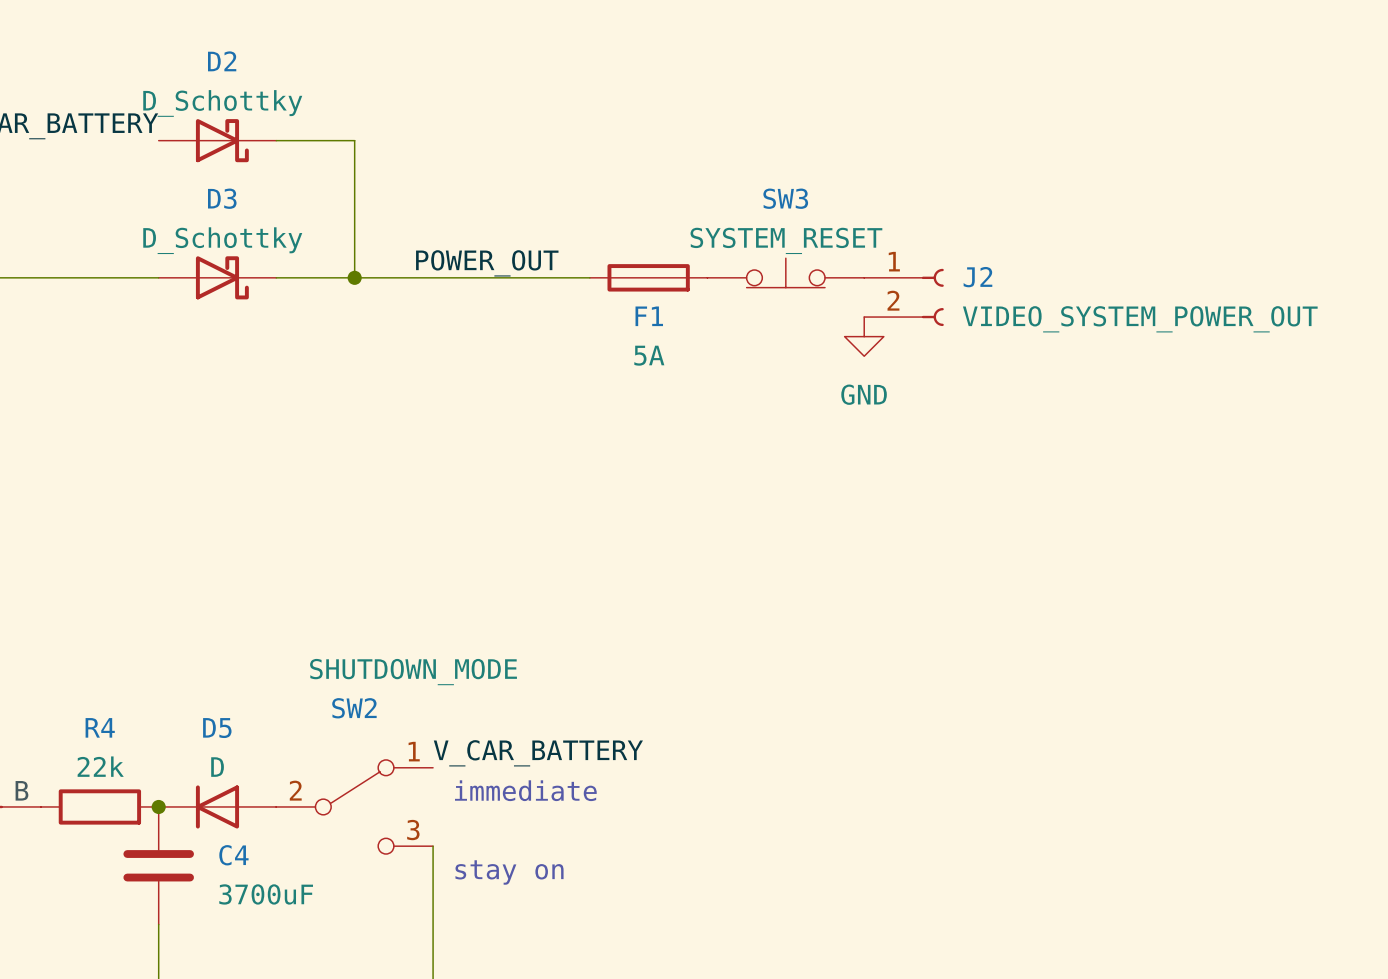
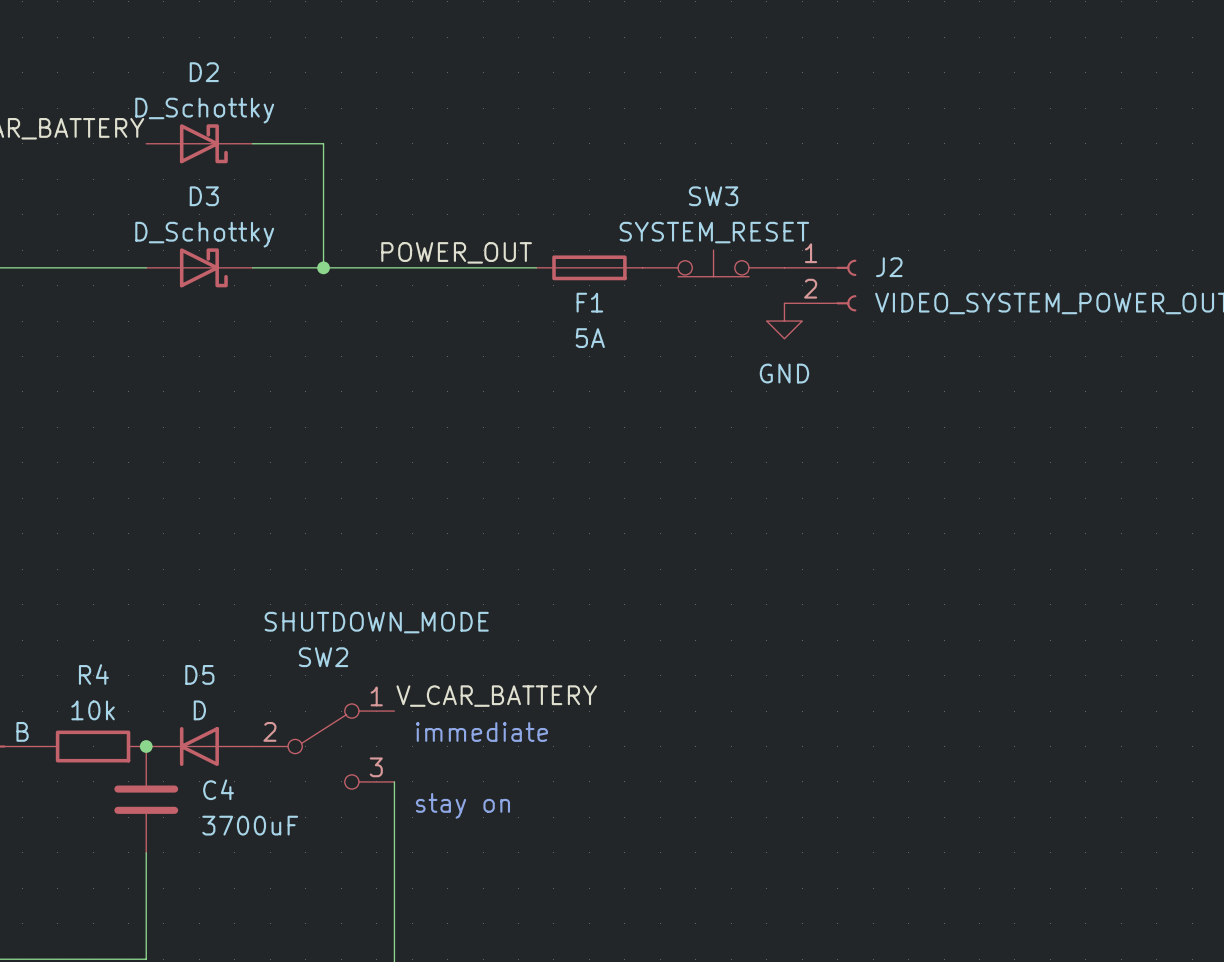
R4 value: 22k (100, 766) -> 10k (93, 710)

